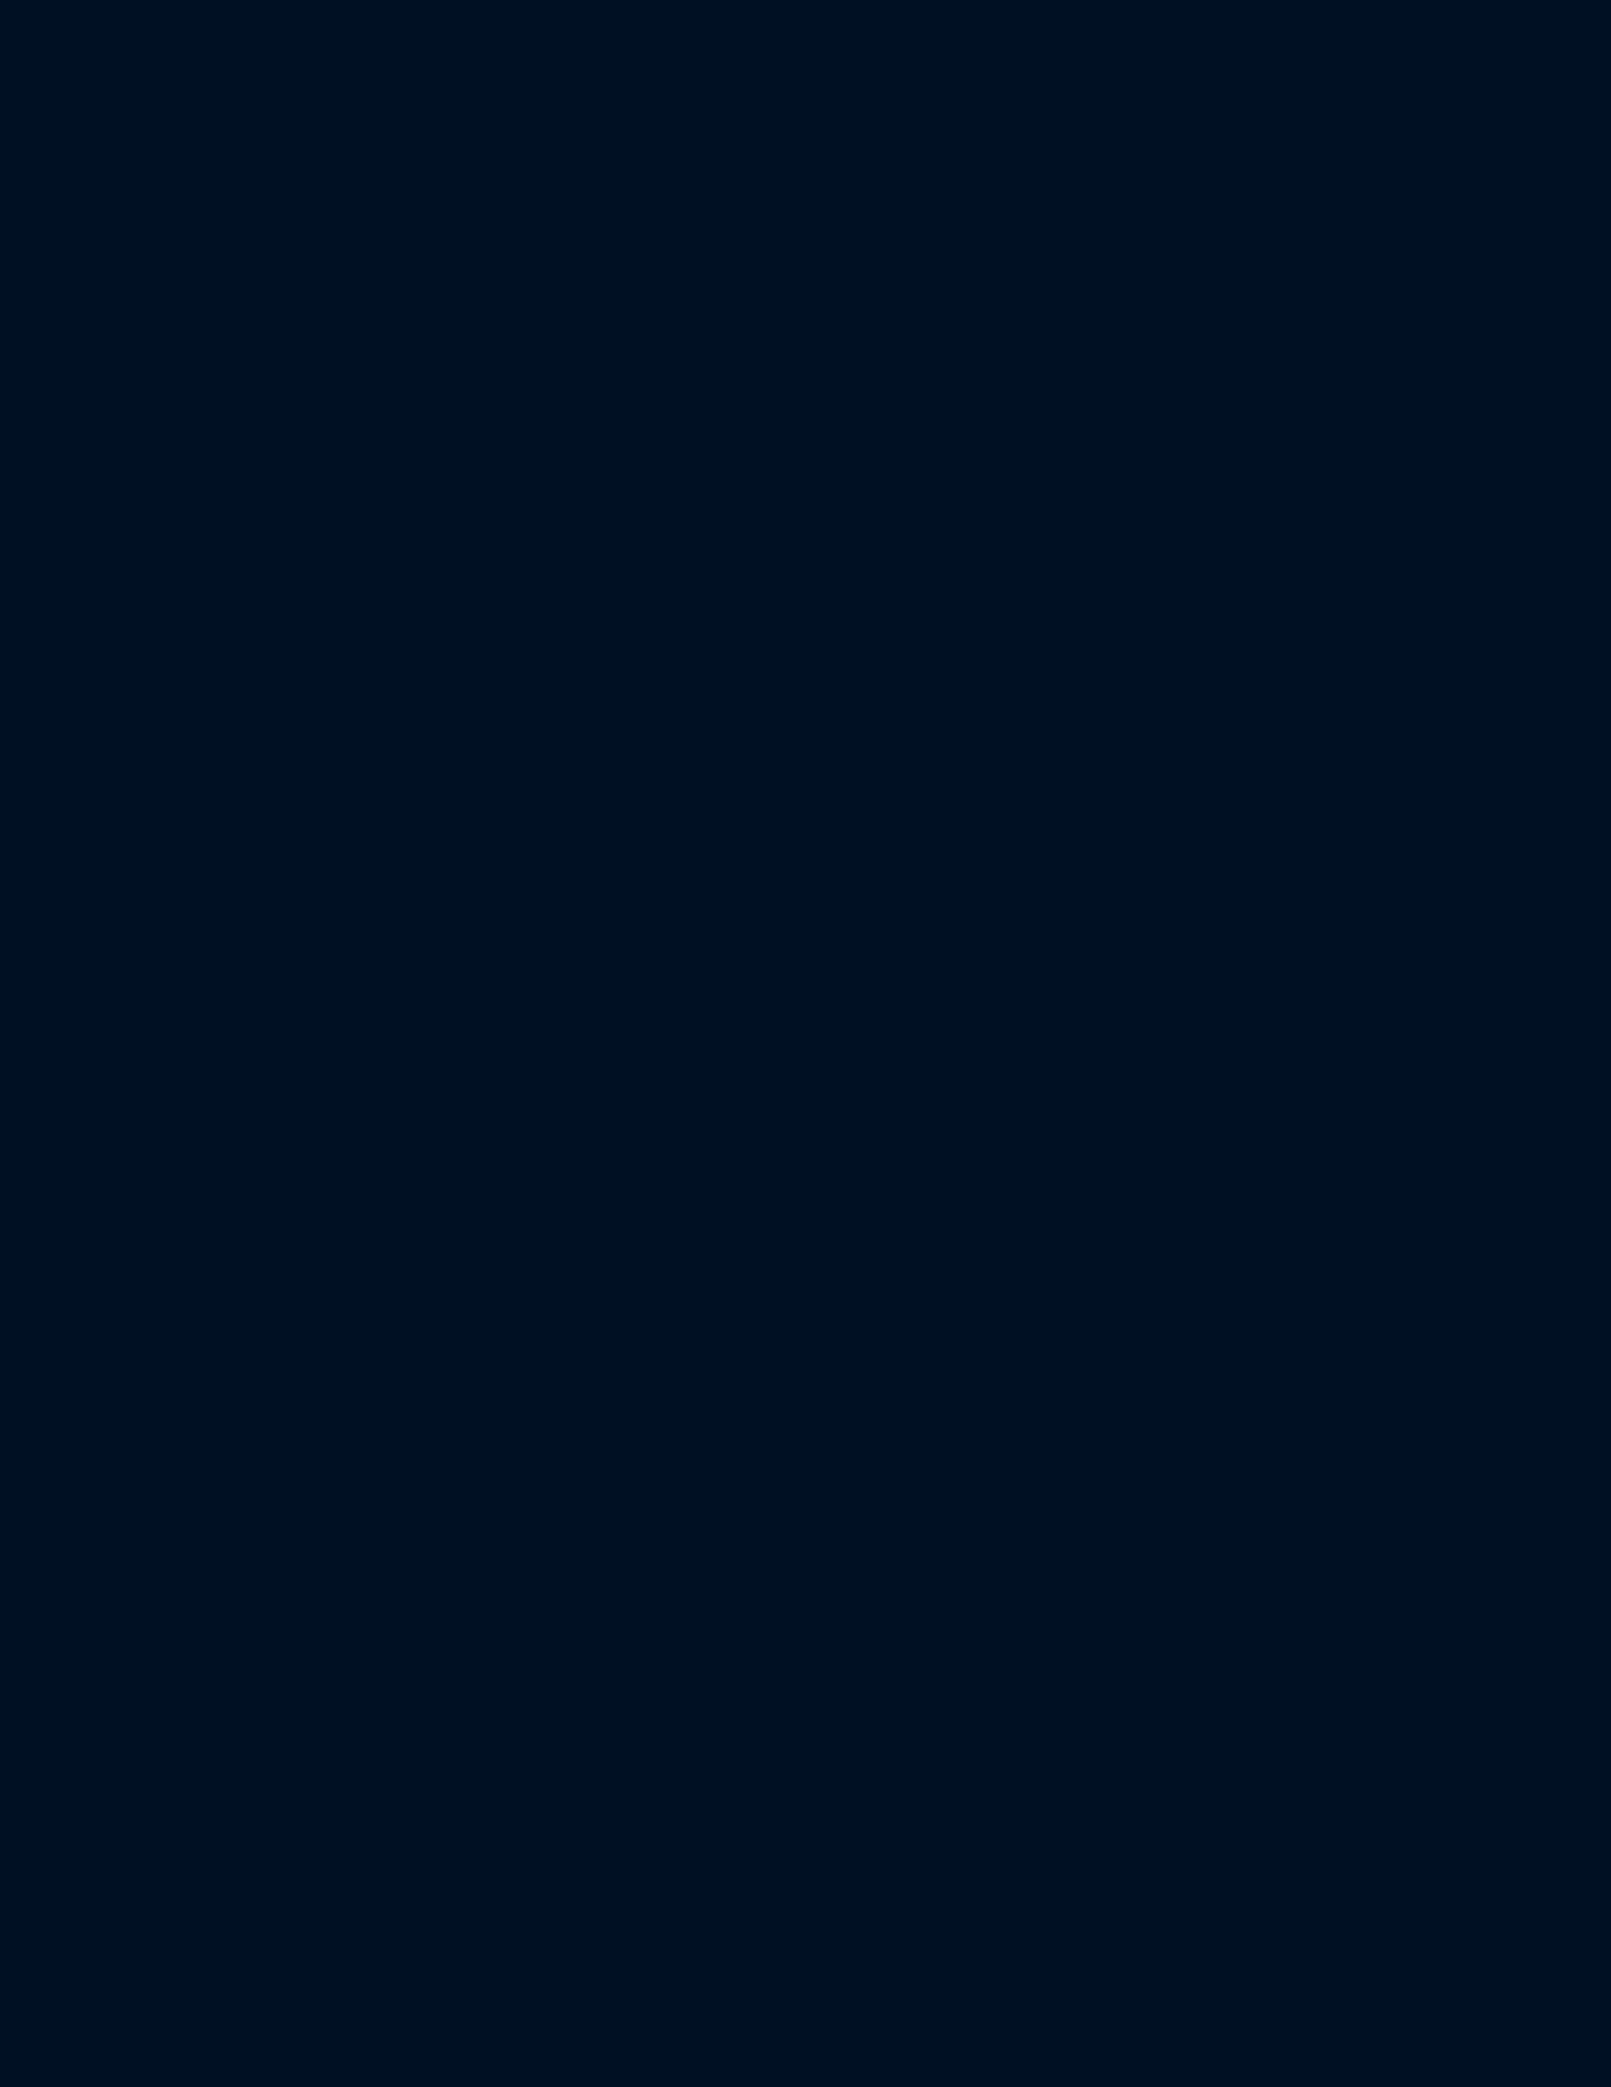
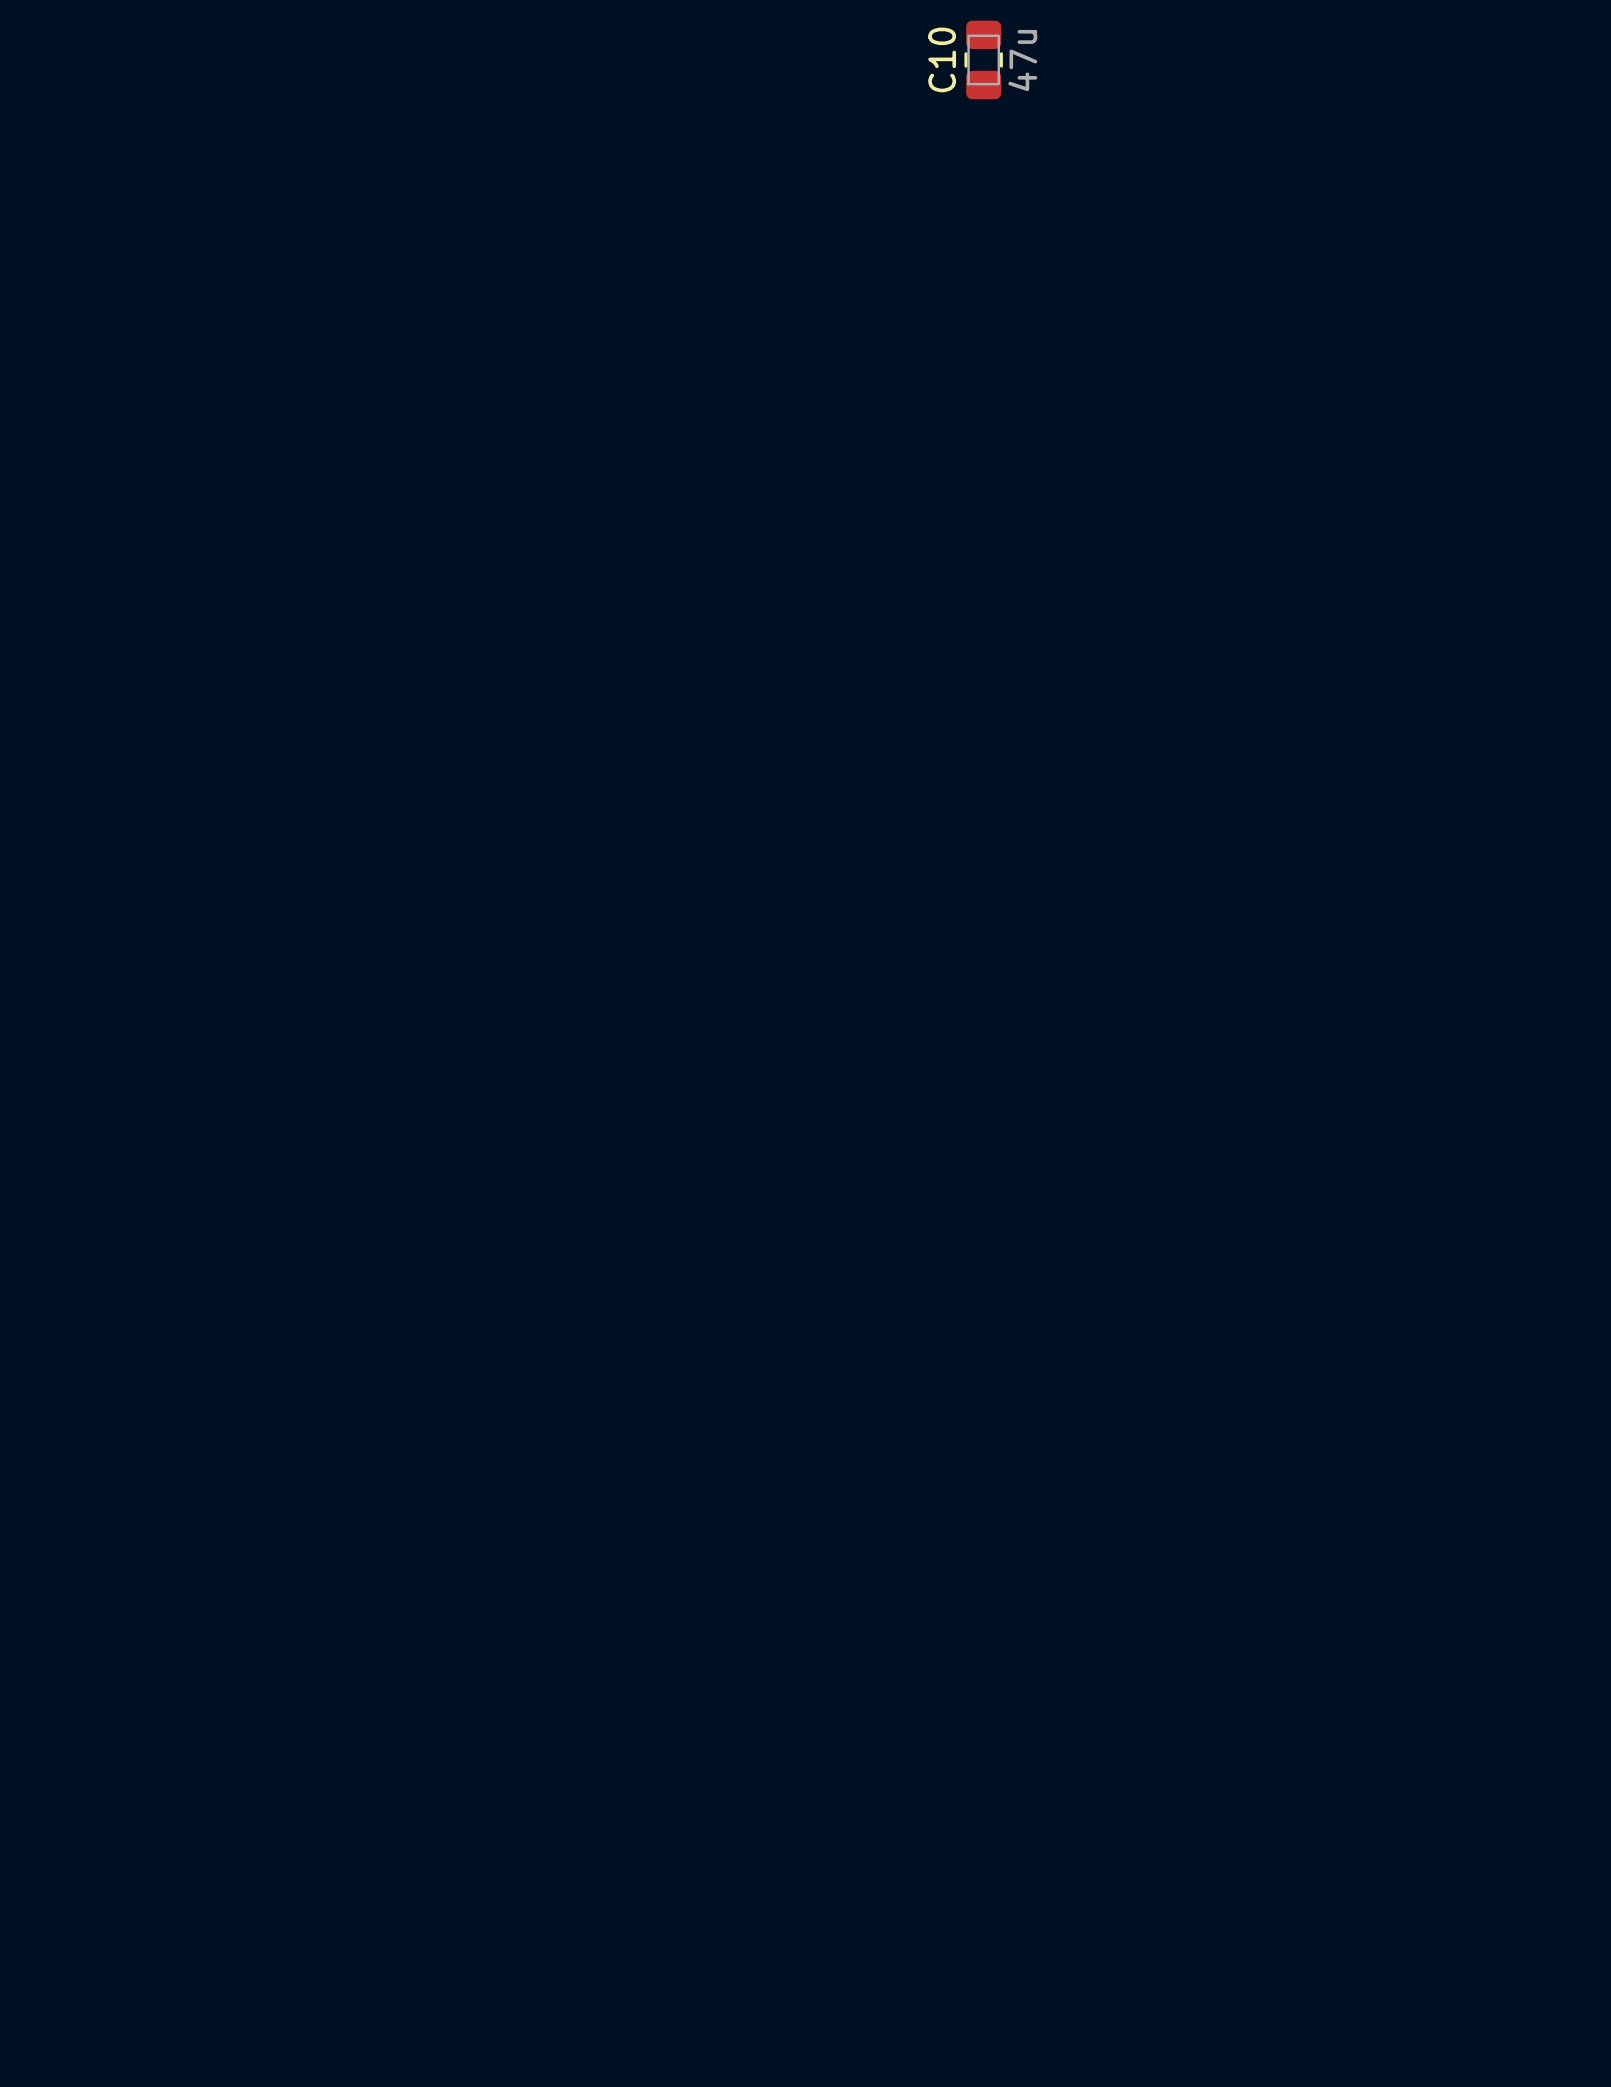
C10: none -> 47u (983, 59)

